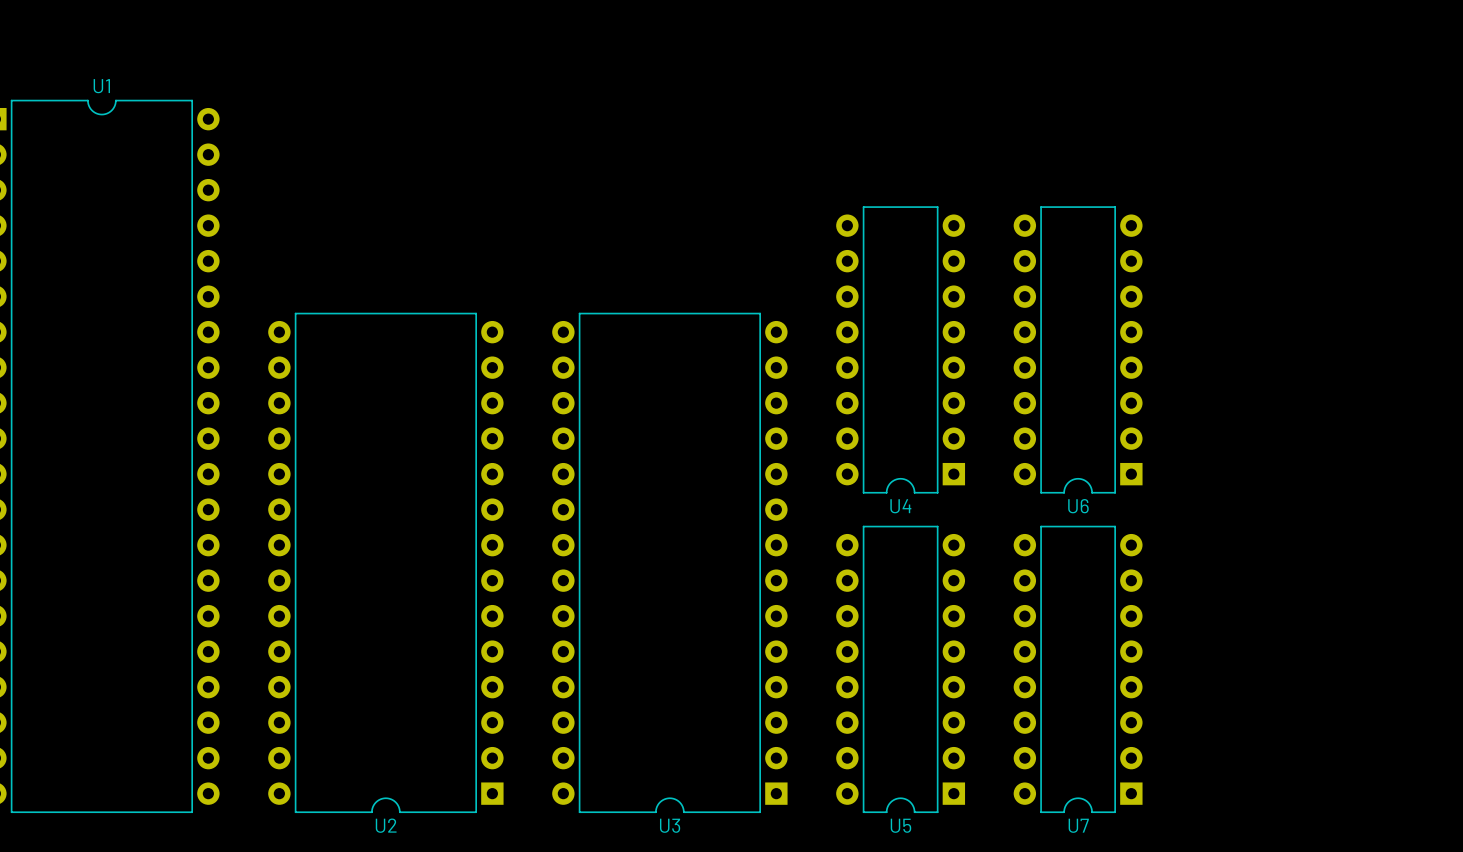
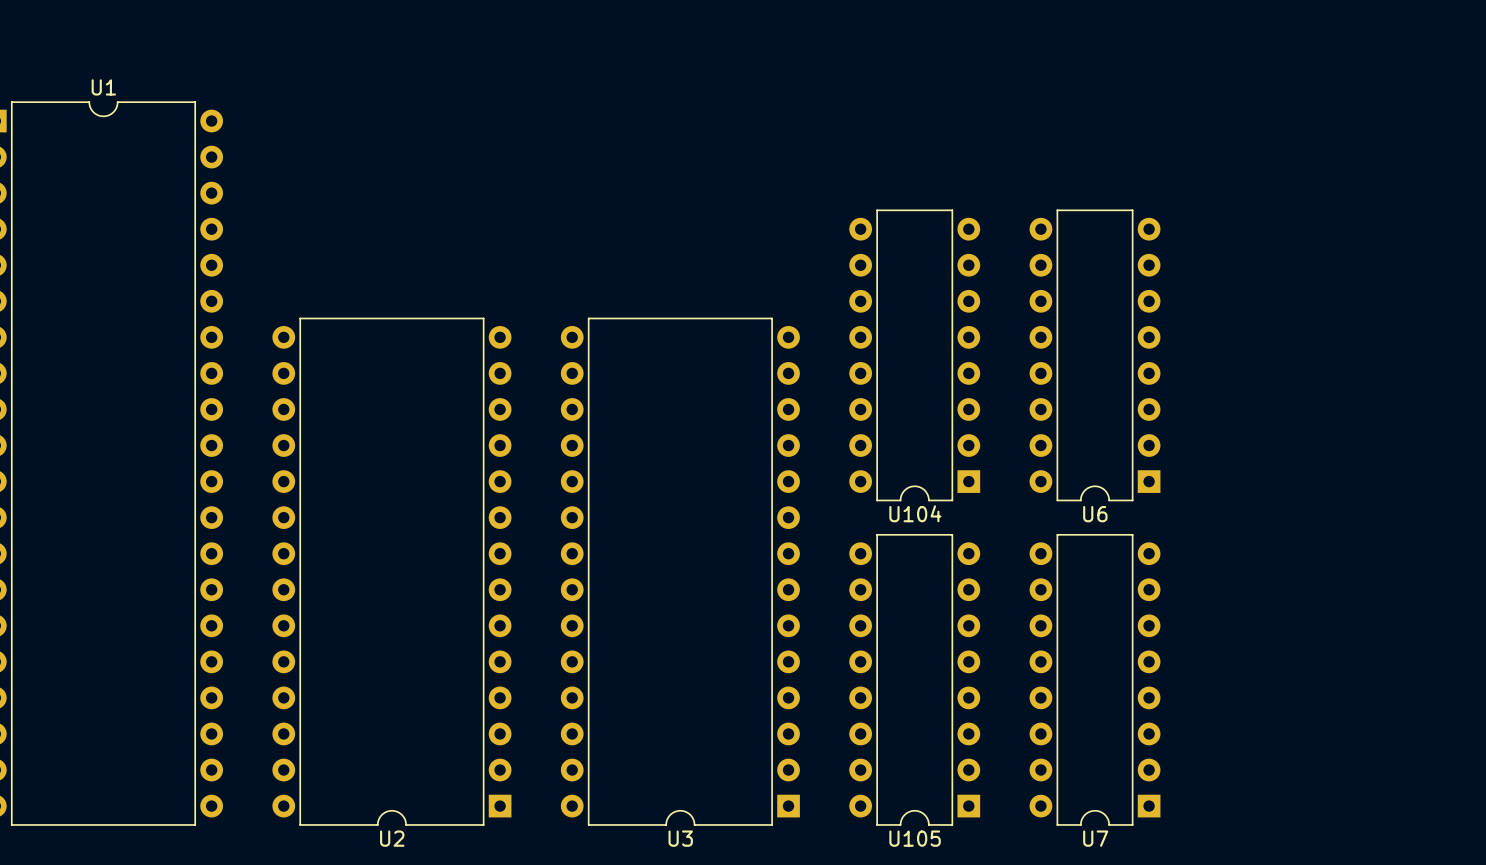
U4 name: U4 (900, 506) -> U104 (915, 513)
U5 name: U5 (900, 825) -> U105 (915, 838)

